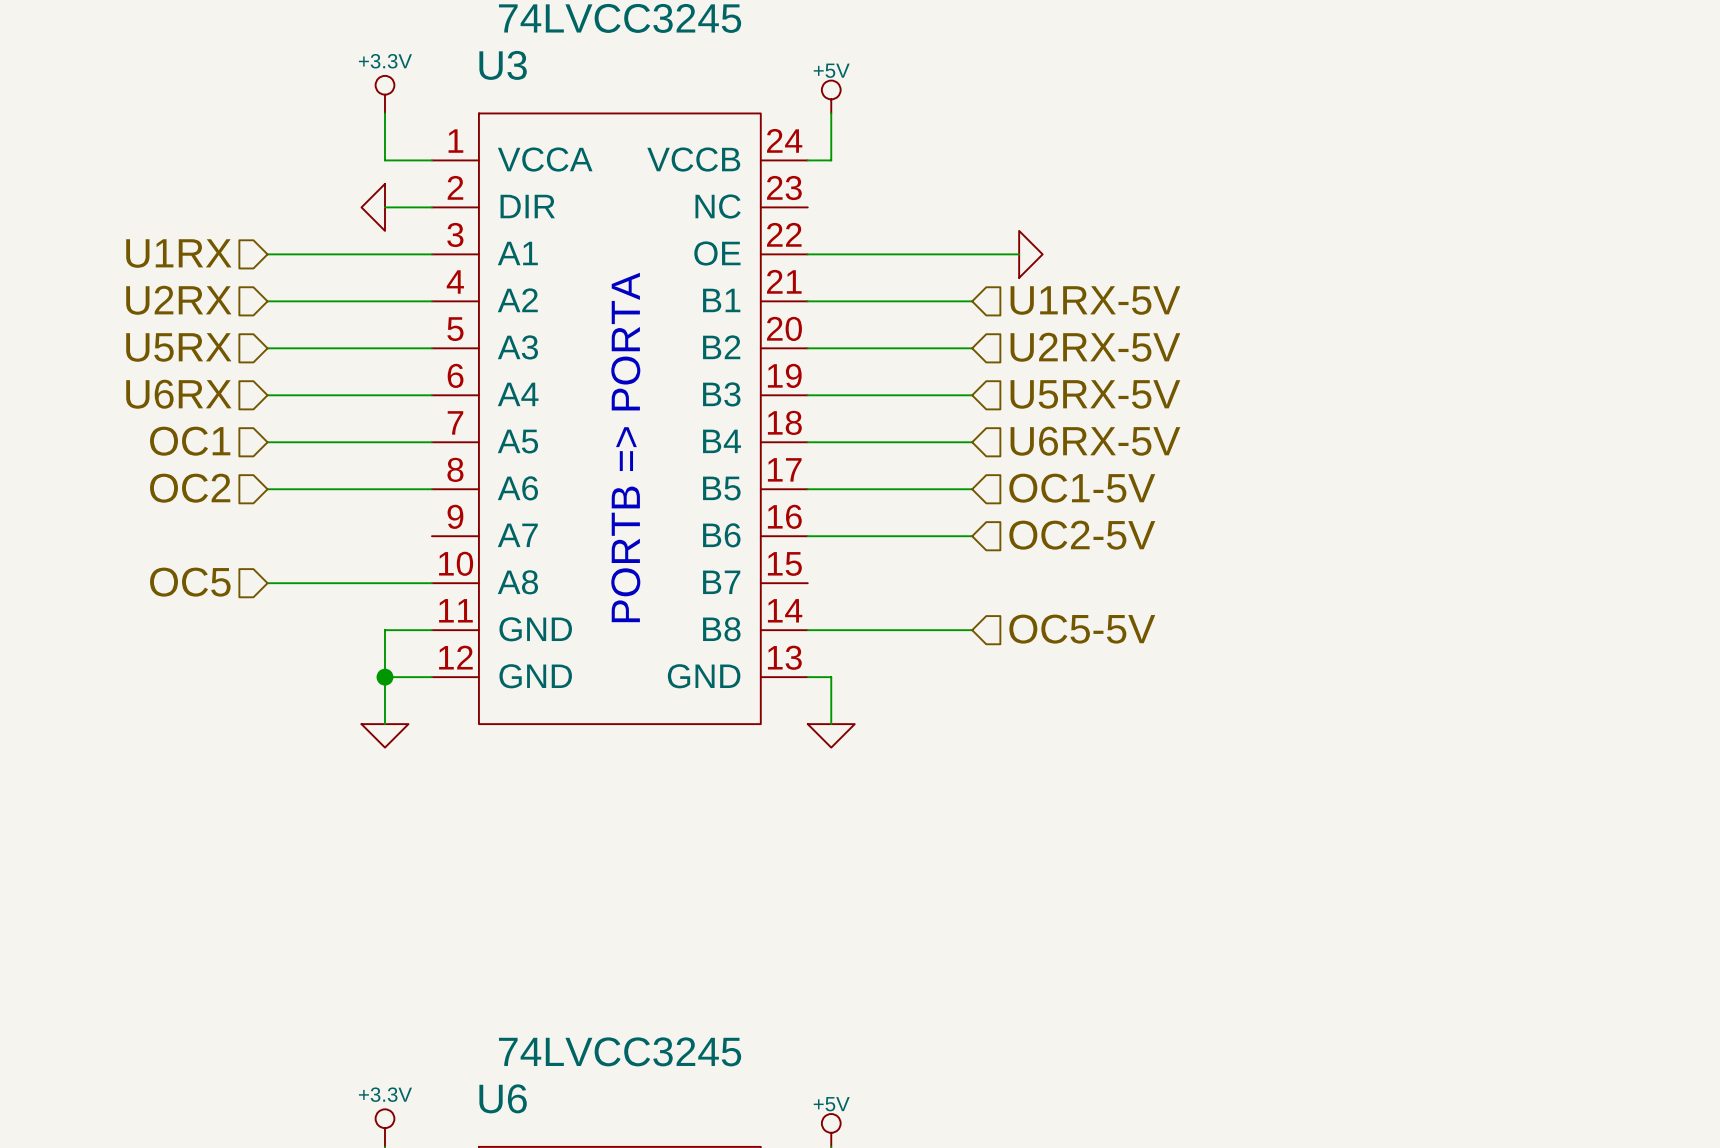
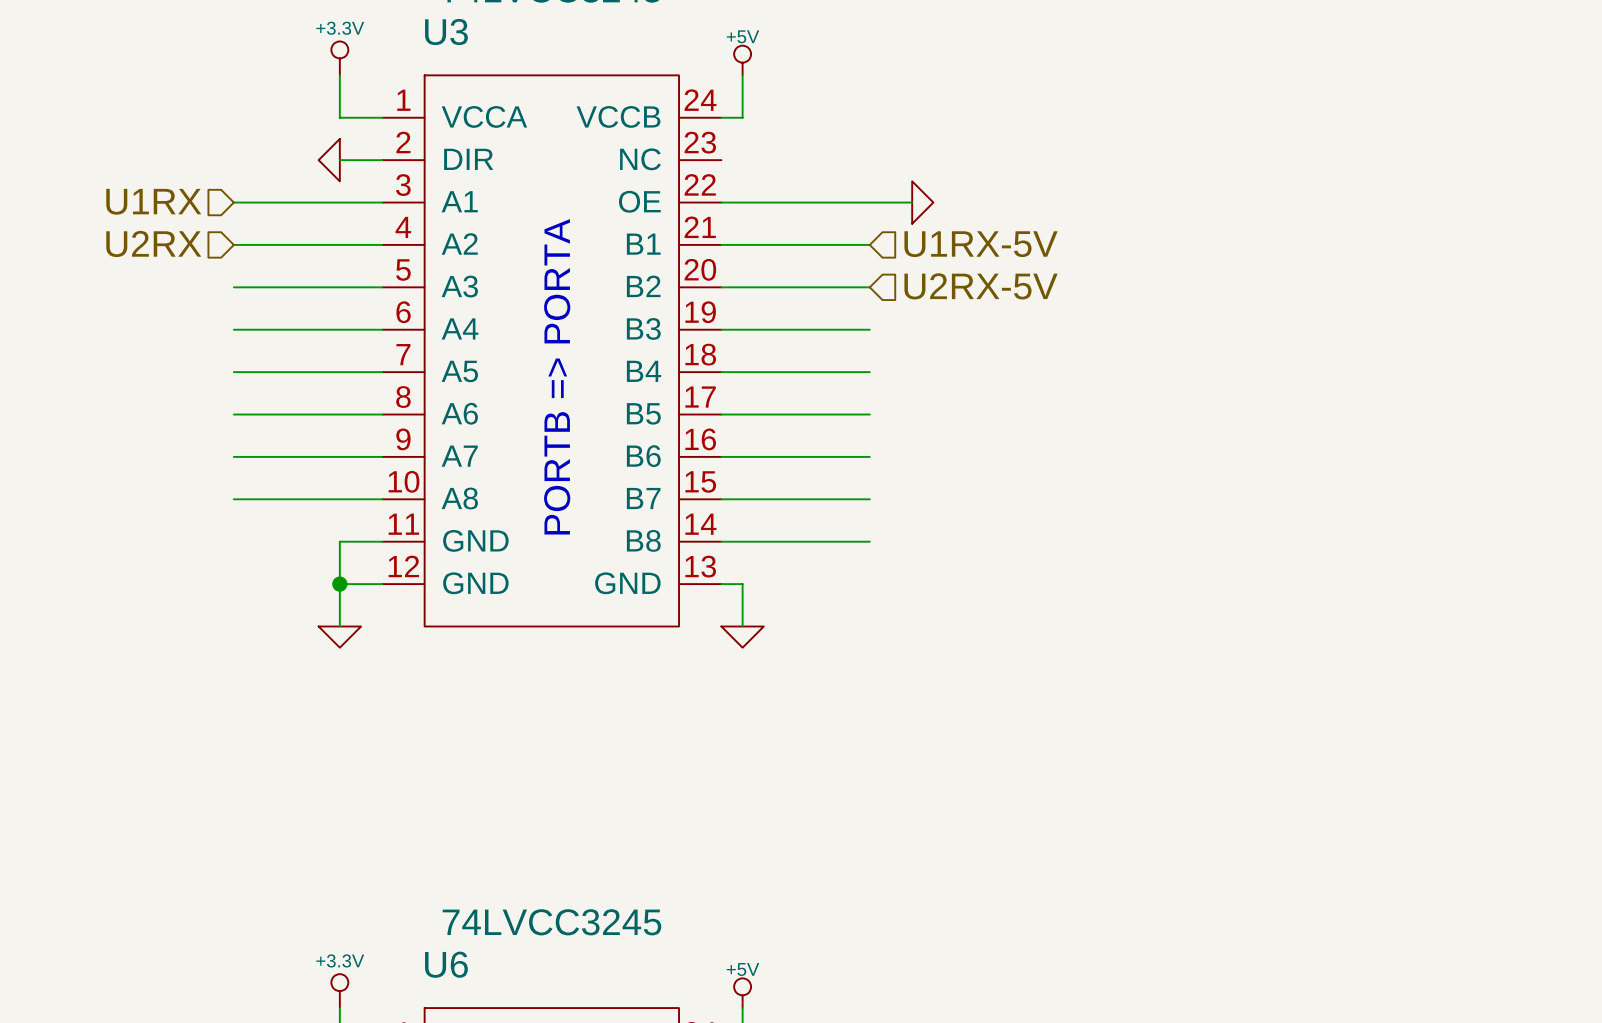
hierarchical label: U5RX (178, 347) -> none
hierarchical label: U6RX (178, 394) -> none
hierarchical label: U5RX-5V (1095, 394) -> none
hierarchical label: OC1 (190, 441) -> none
hierarchical label: U6RX-5V (1095, 441) -> none
hierarchical label: OC2 (190, 488) -> none
hierarchical label: OC1-5V (1082, 488) -> none
hierarchical label: OC2-5V (1082, 535) -> none
wire: none -> (233, 456) (382, 456)
hierarchical label: OC5 (190, 582) -> none
wire: none -> (721, 499) (869, 499)
hierarchical label: OC5-5V (1082, 629) -> none

